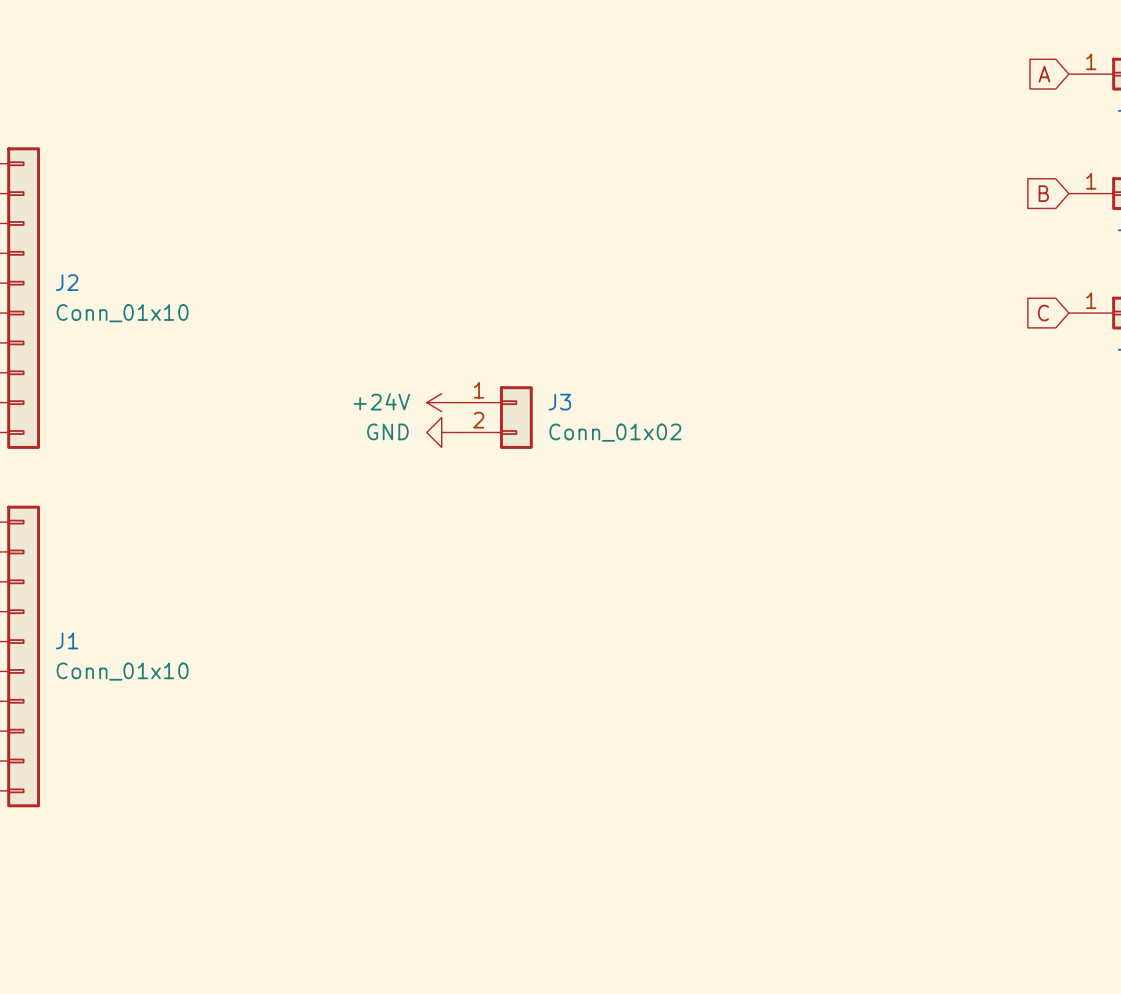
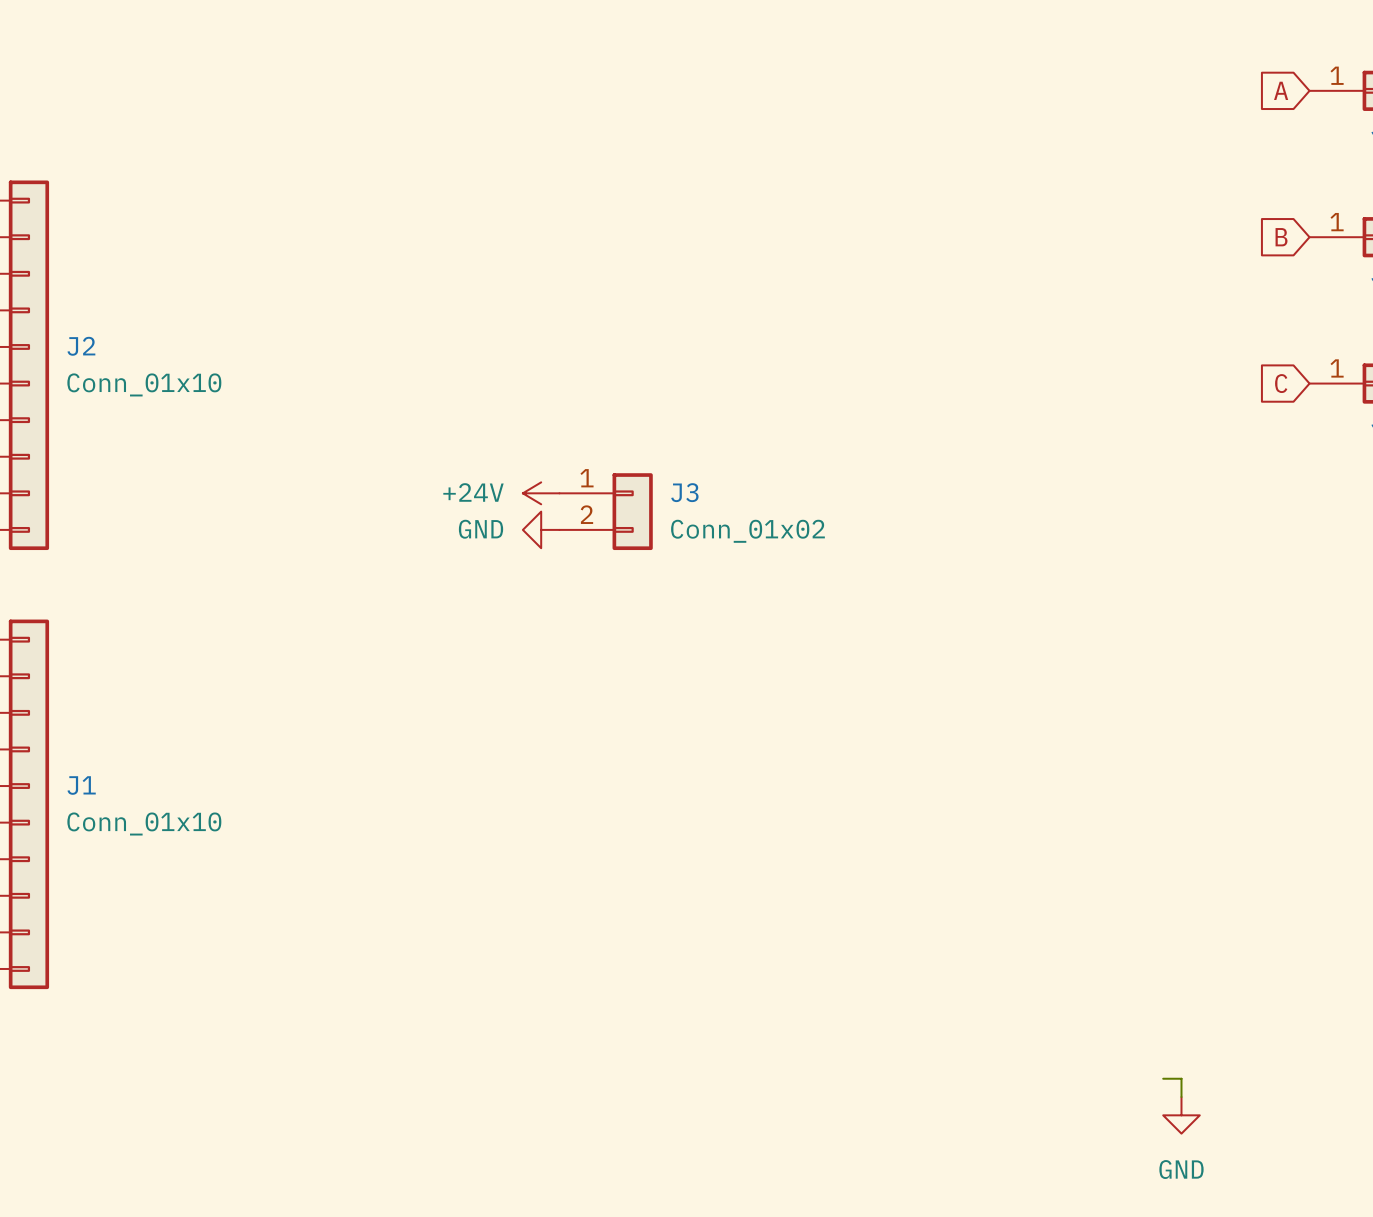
wire: none -> (1163, 1078) (1181, 1078) (1181, 1097)
power symbol: none -> GND (1181, 1115)

